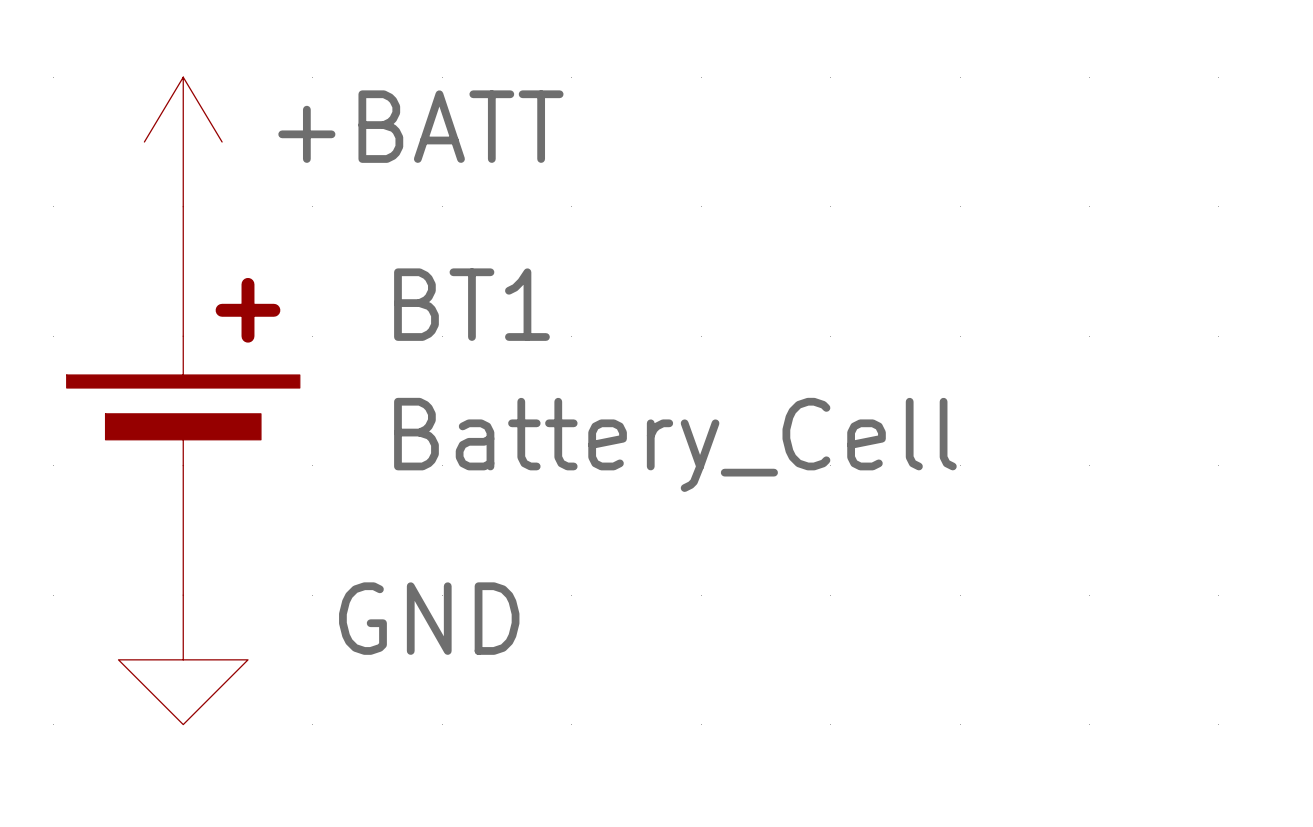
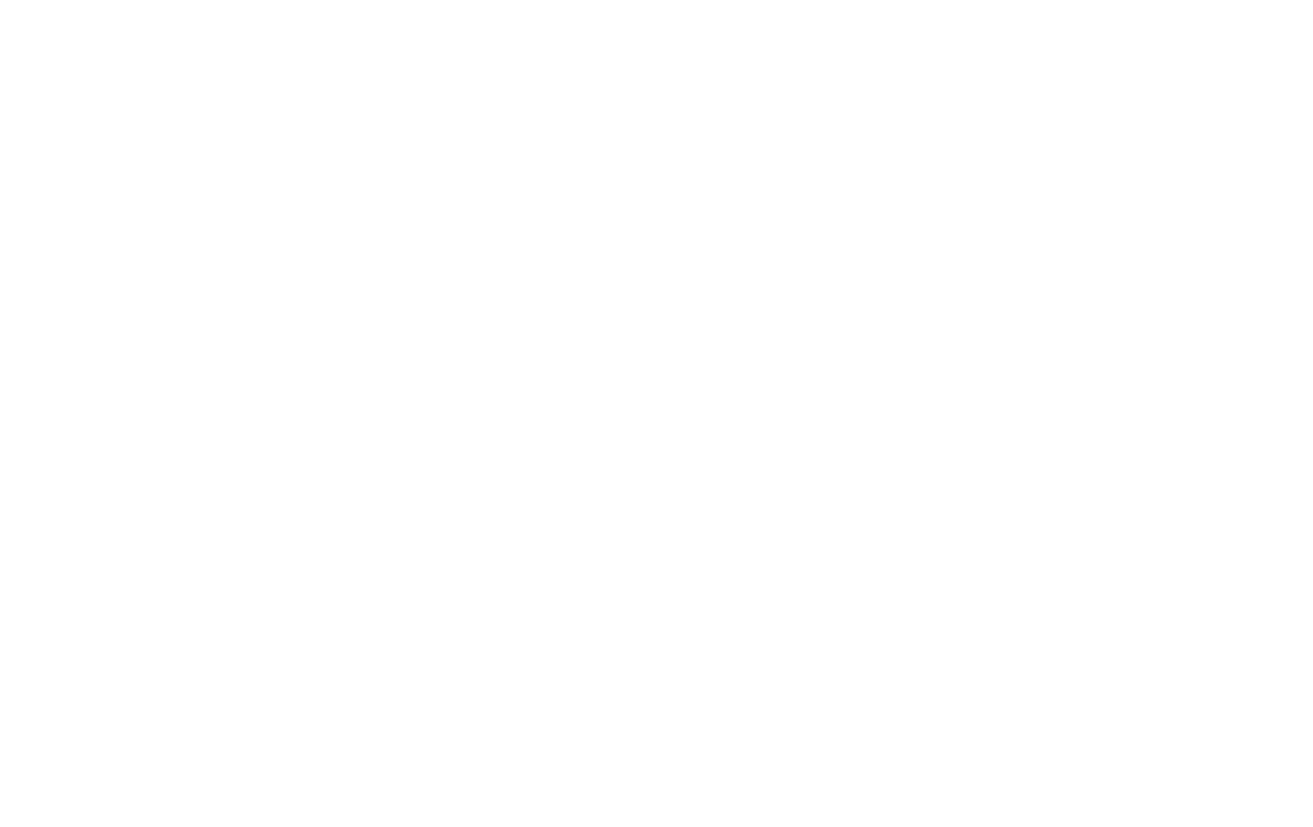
power symbol: +BATT (183, 141) -> none
BT1: Battery_Cell (183, 400) -> none
power symbol: GND (183, 659) -> none

